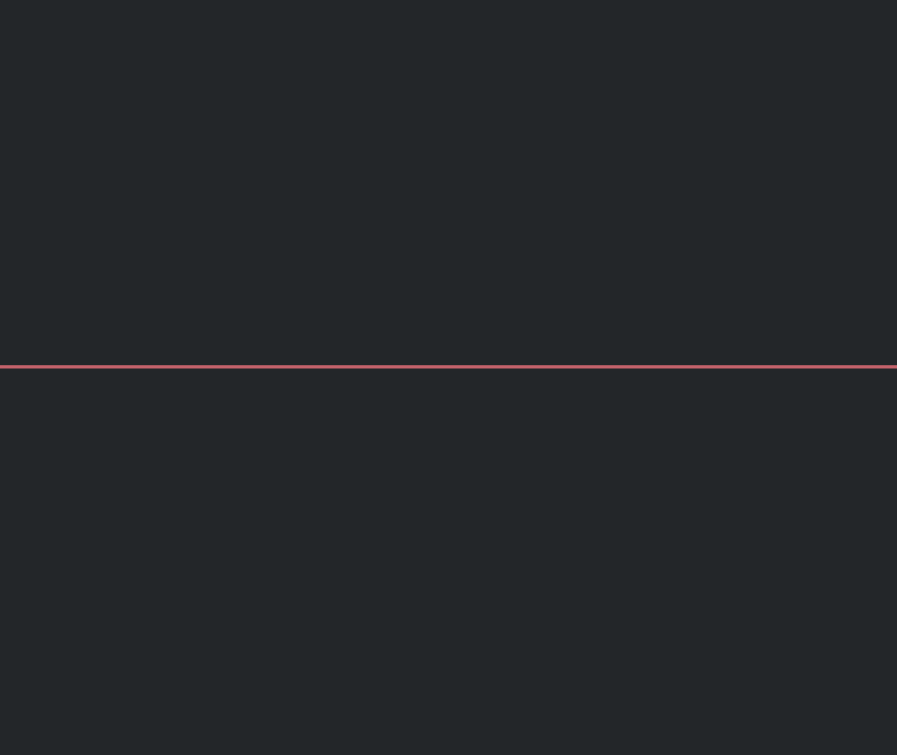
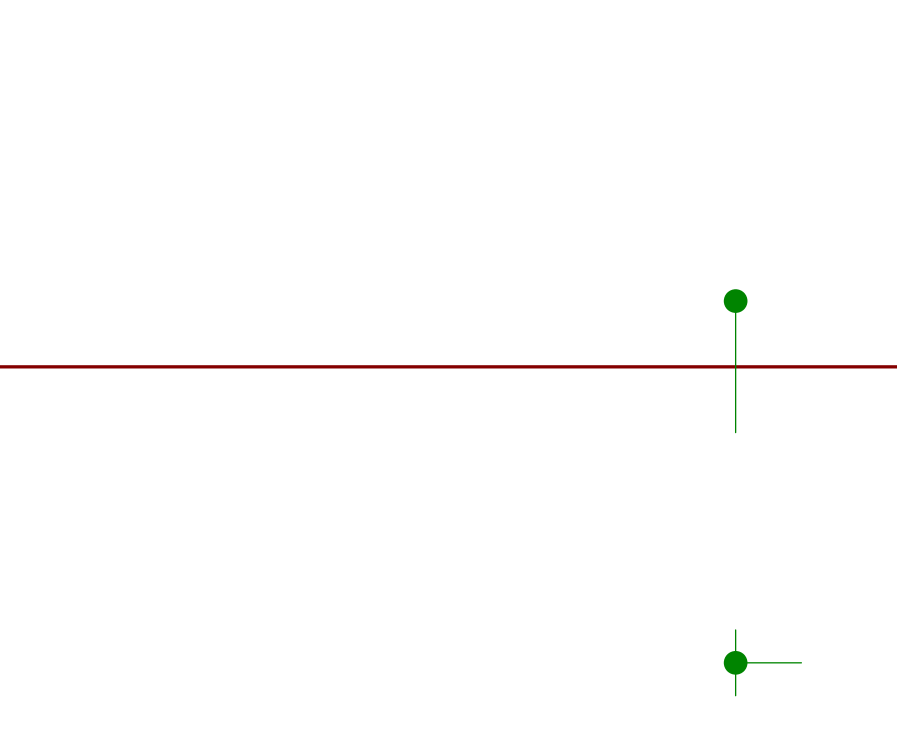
wire: none -> (735, 301) (735, 432)
junction: none -> (735, 301)
wire: none -> (735, 629) (735, 695)
wire: none -> (735, 662) (801, 662)
junction: none -> (735, 662)

